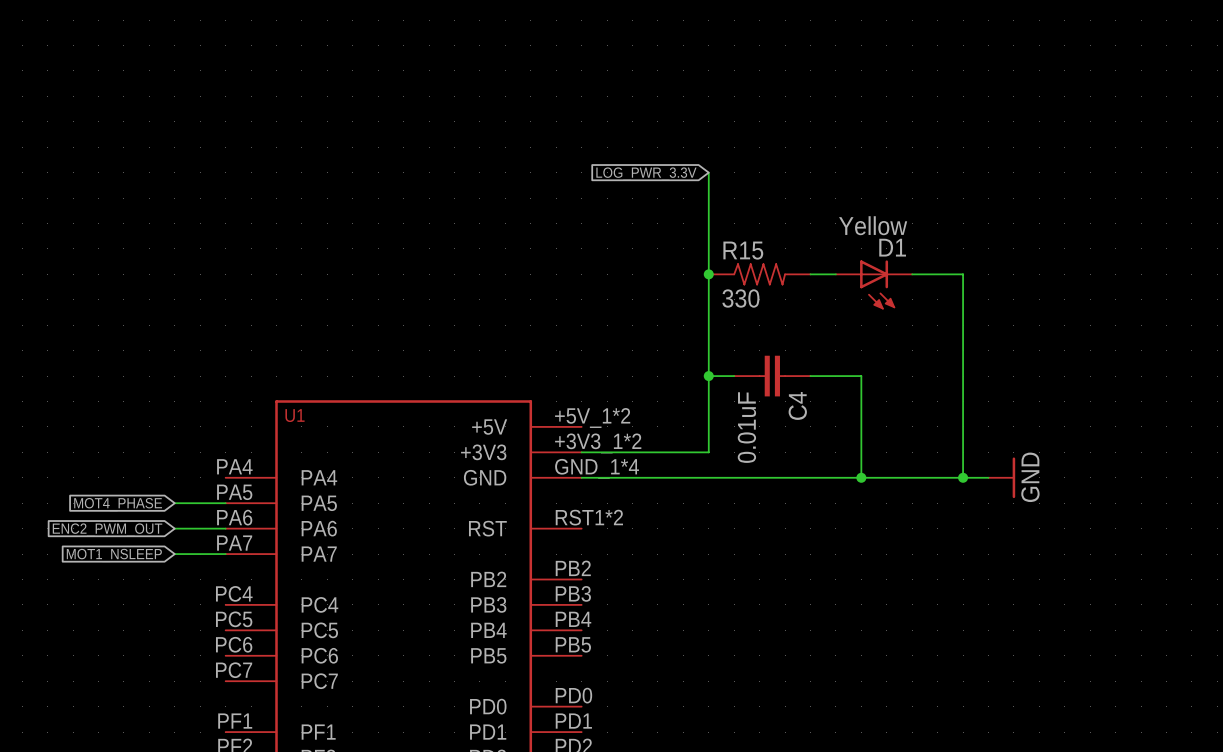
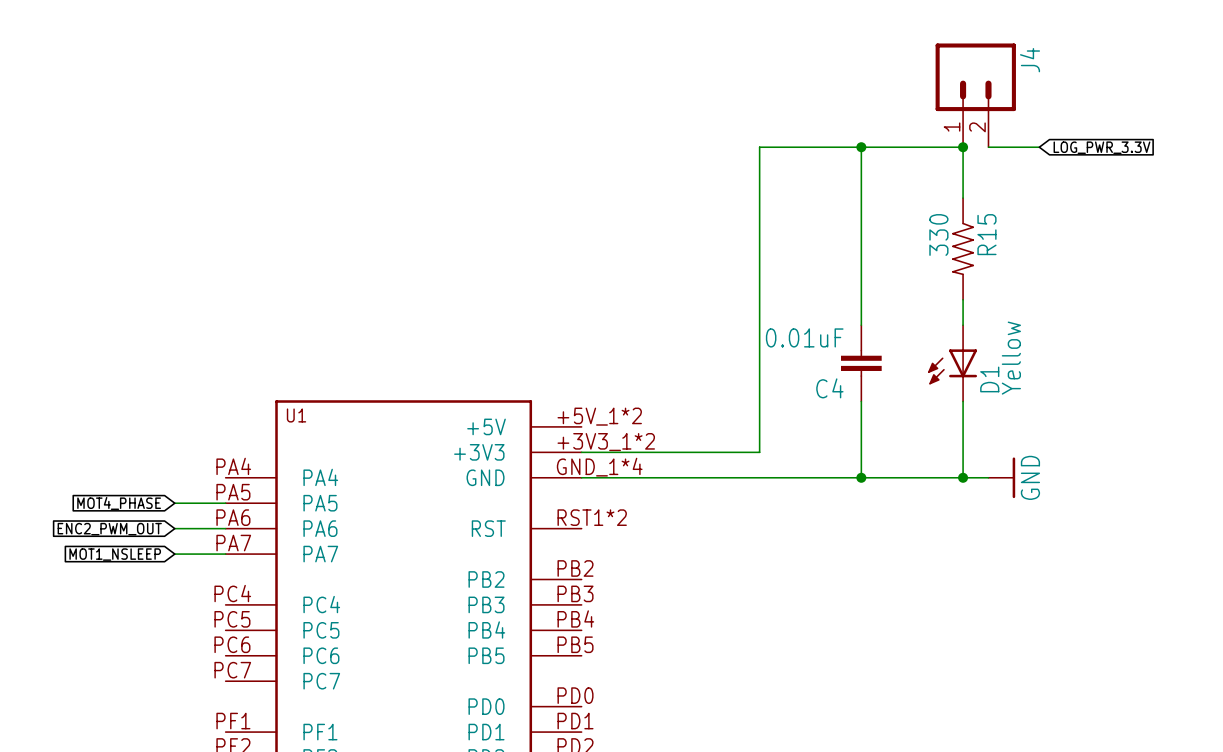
J4: none -> (975, 95)
wire: none -> (861, 147) (861, 325)
junction: none -> (861, 147)
junction: none -> (963, 147)
wire: none -> (988, 147) (1039, 147)
global label: none -> LOG_PWR_3.3V (1101, 147)
wire: (708, 172) (708, 452) -> (963, 198) (963, 147) (759, 147) (759, 452) (708, 452)
global label: LOG_PWR_3.3V (646, 174) -> none
junction: (708, 274) -> none
R15 rotation: 0° (759, 274) -> 90° clockwise (963, 248)
R15 position: (759, 274) -> (963, 248)
wire: (810, 274) (835, 274) -> none
wire: (912, 274) (963, 274) (963, 299) -> none
D1 position: (874, 284) -> (952, 363)
D1 rotation: 0° (877, 284) -> 90° clockwise (952, 366)
wire: (708, 376) (734, 376) -> none
junction: (708, 376) -> none
C4 rotation: 0° (772, 376) -> 90° clockwise (861, 363)
C4 position: (772, 376) -> (861, 363)
wire: (810, 376) (861, 376) (861, 401) -> none

